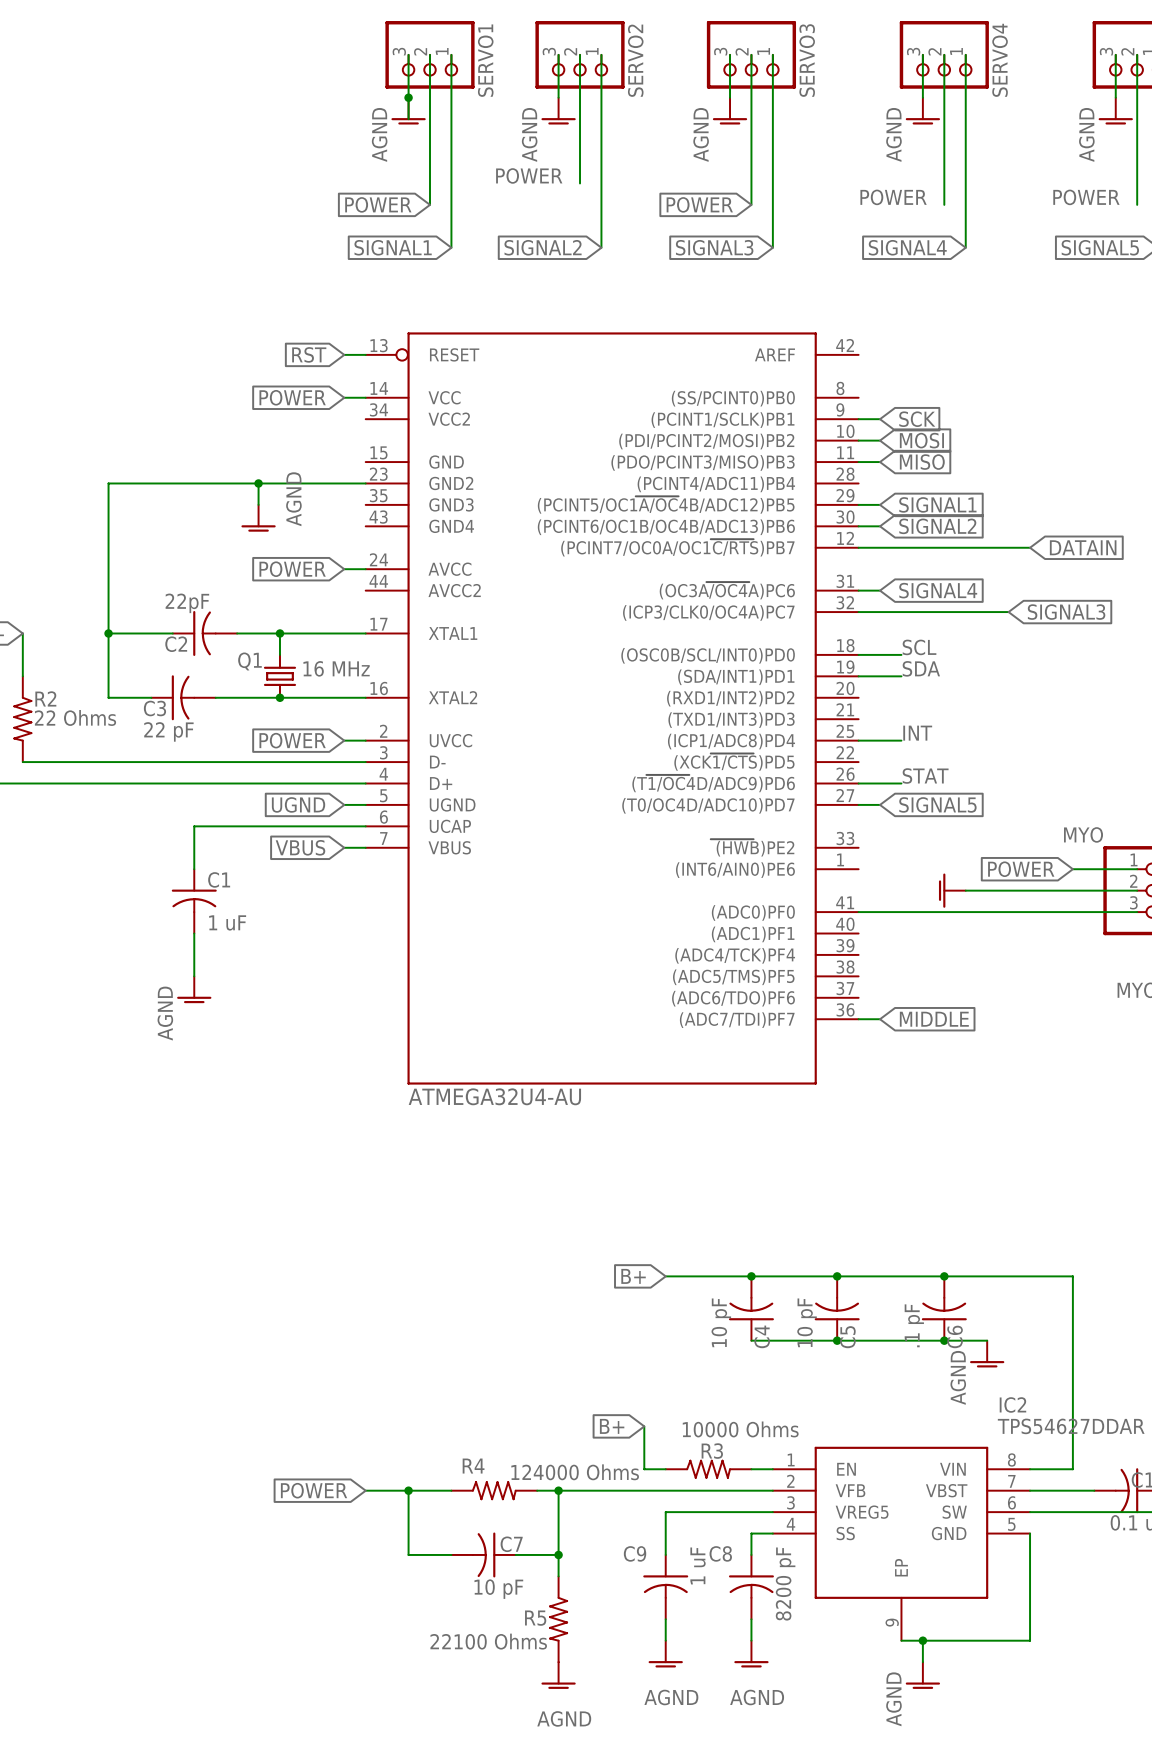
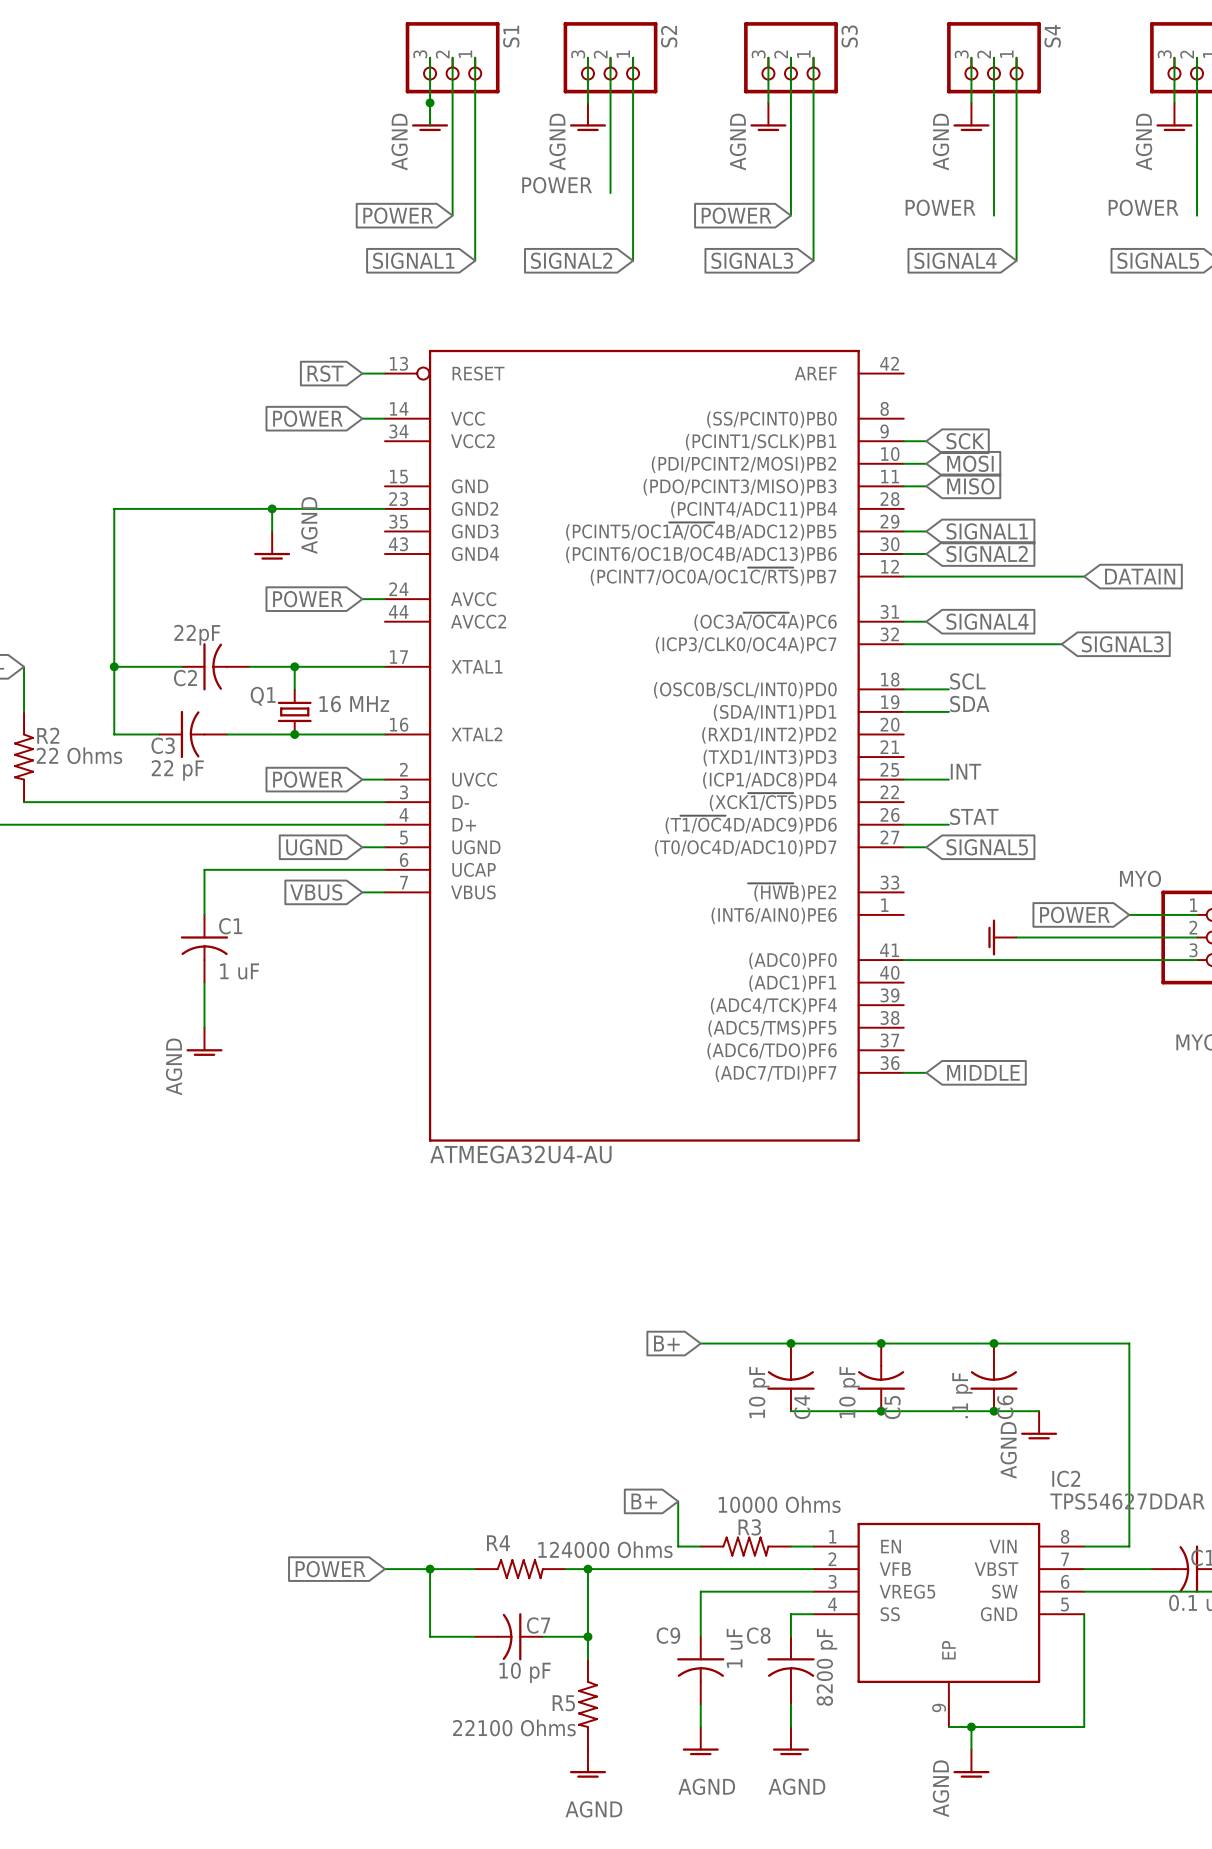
SERVO1 name: SERVO1 (485, 60) -> S1 (511, 36)
SERVO2 name: SERVO2 (635, 60) -> S2 (669, 36)
SERVO3 name: SERVO3 (807, 60) -> S3 (849, 36)
SERVO4 name: SERVO4 (1000, 60) -> S4 (1052, 36)

